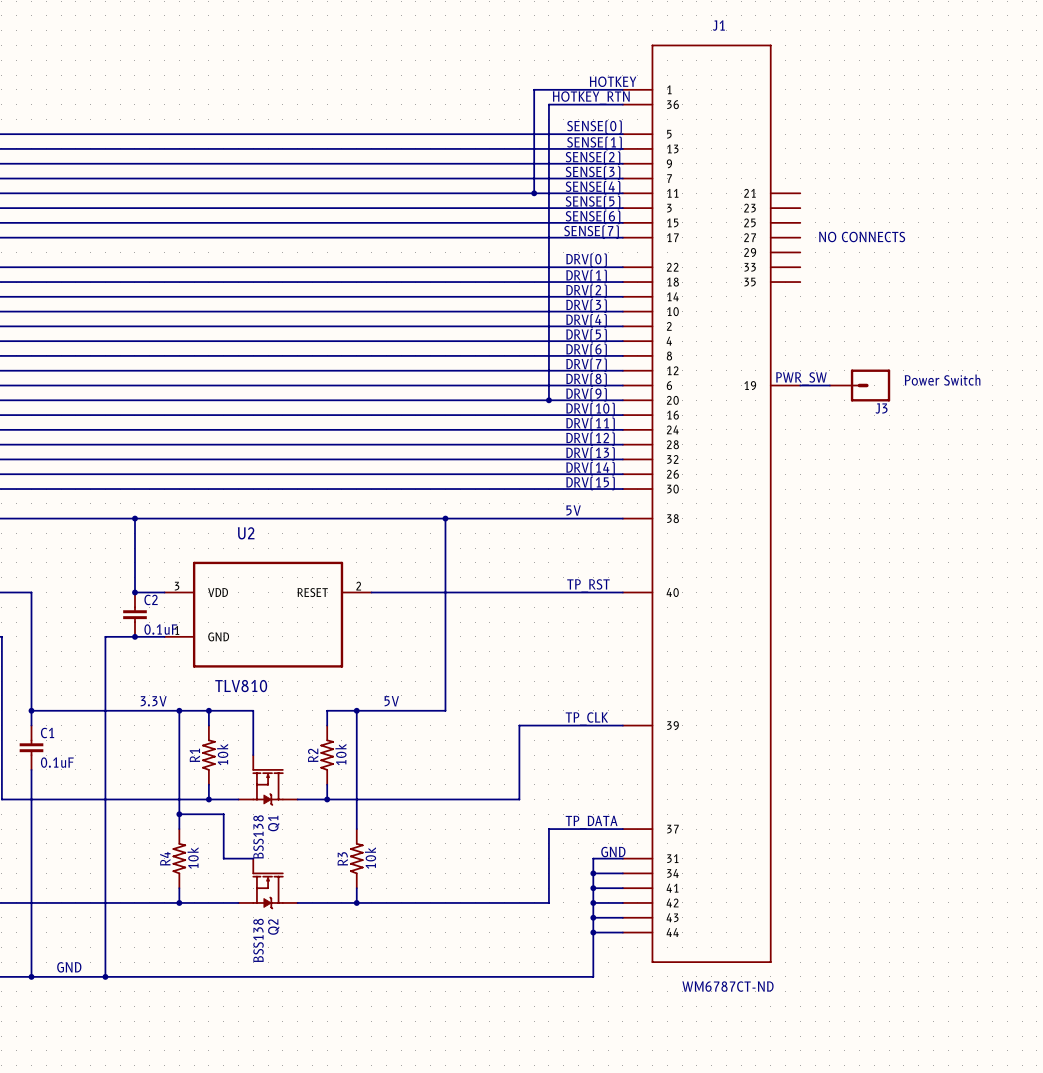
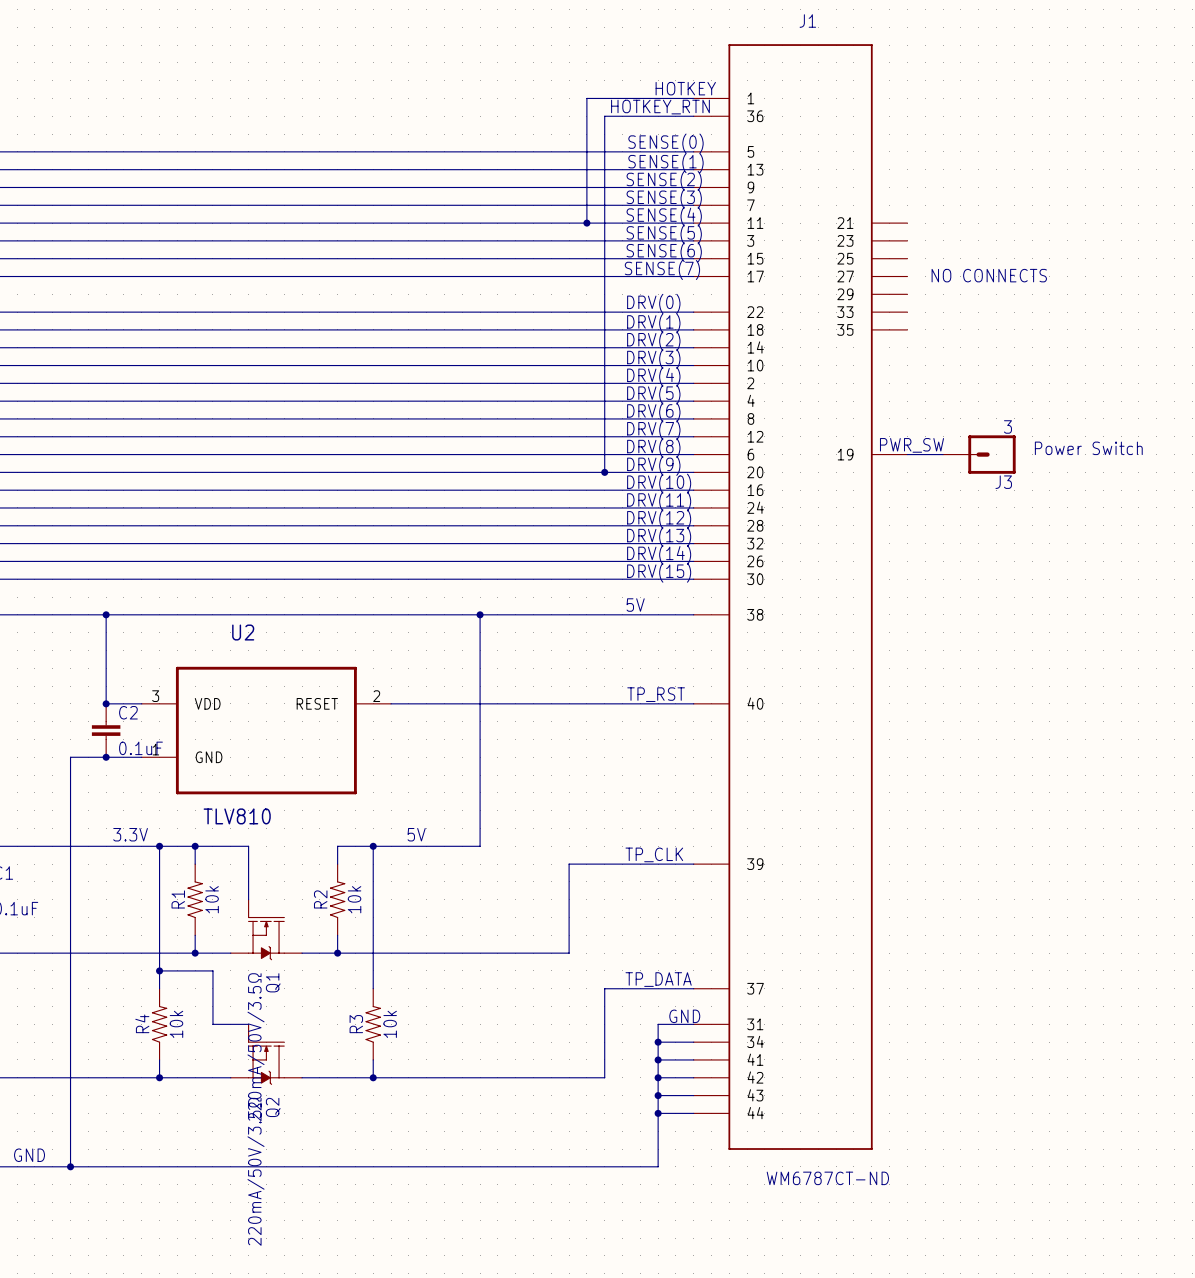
J3 value: none -> 3 (1007, 426)
Q1 value: BSS138 (258, 836) -> 220mA/50V/3.5Ω (256, 1047)
Q2 value: BSS138 (258, 940) -> 220mA/50V/3.5Ω (256, 1171)

